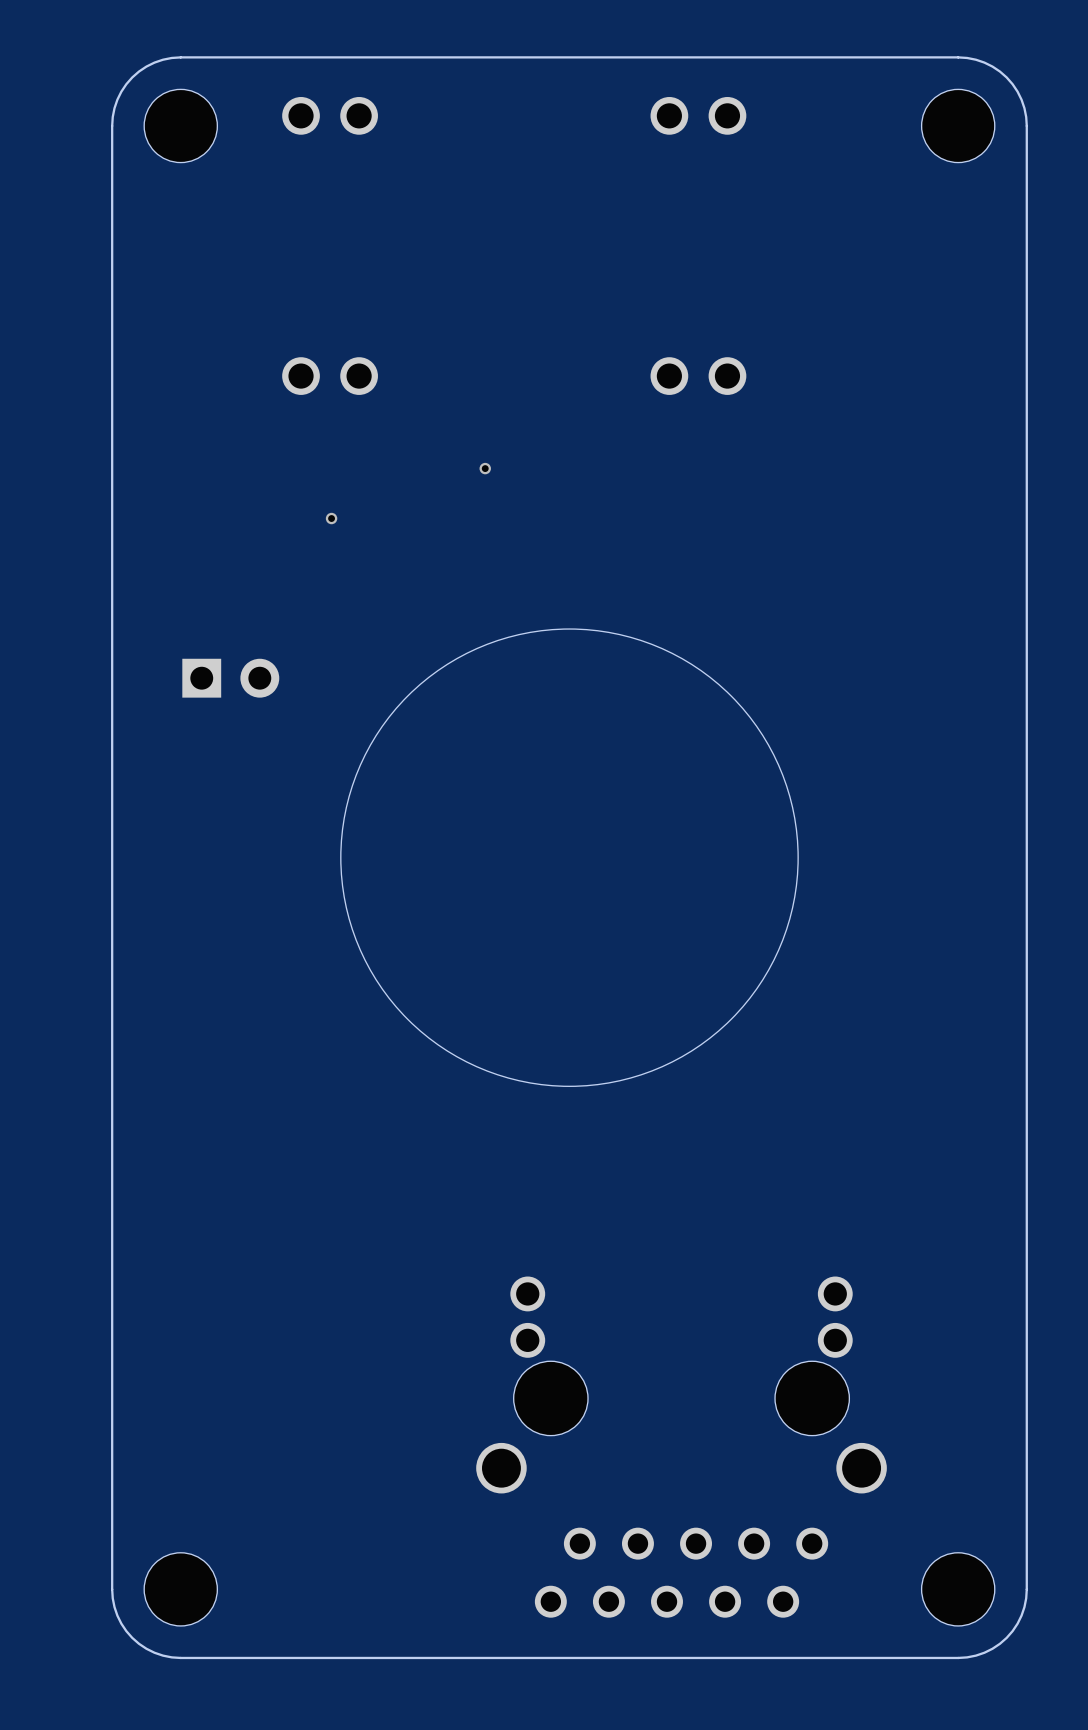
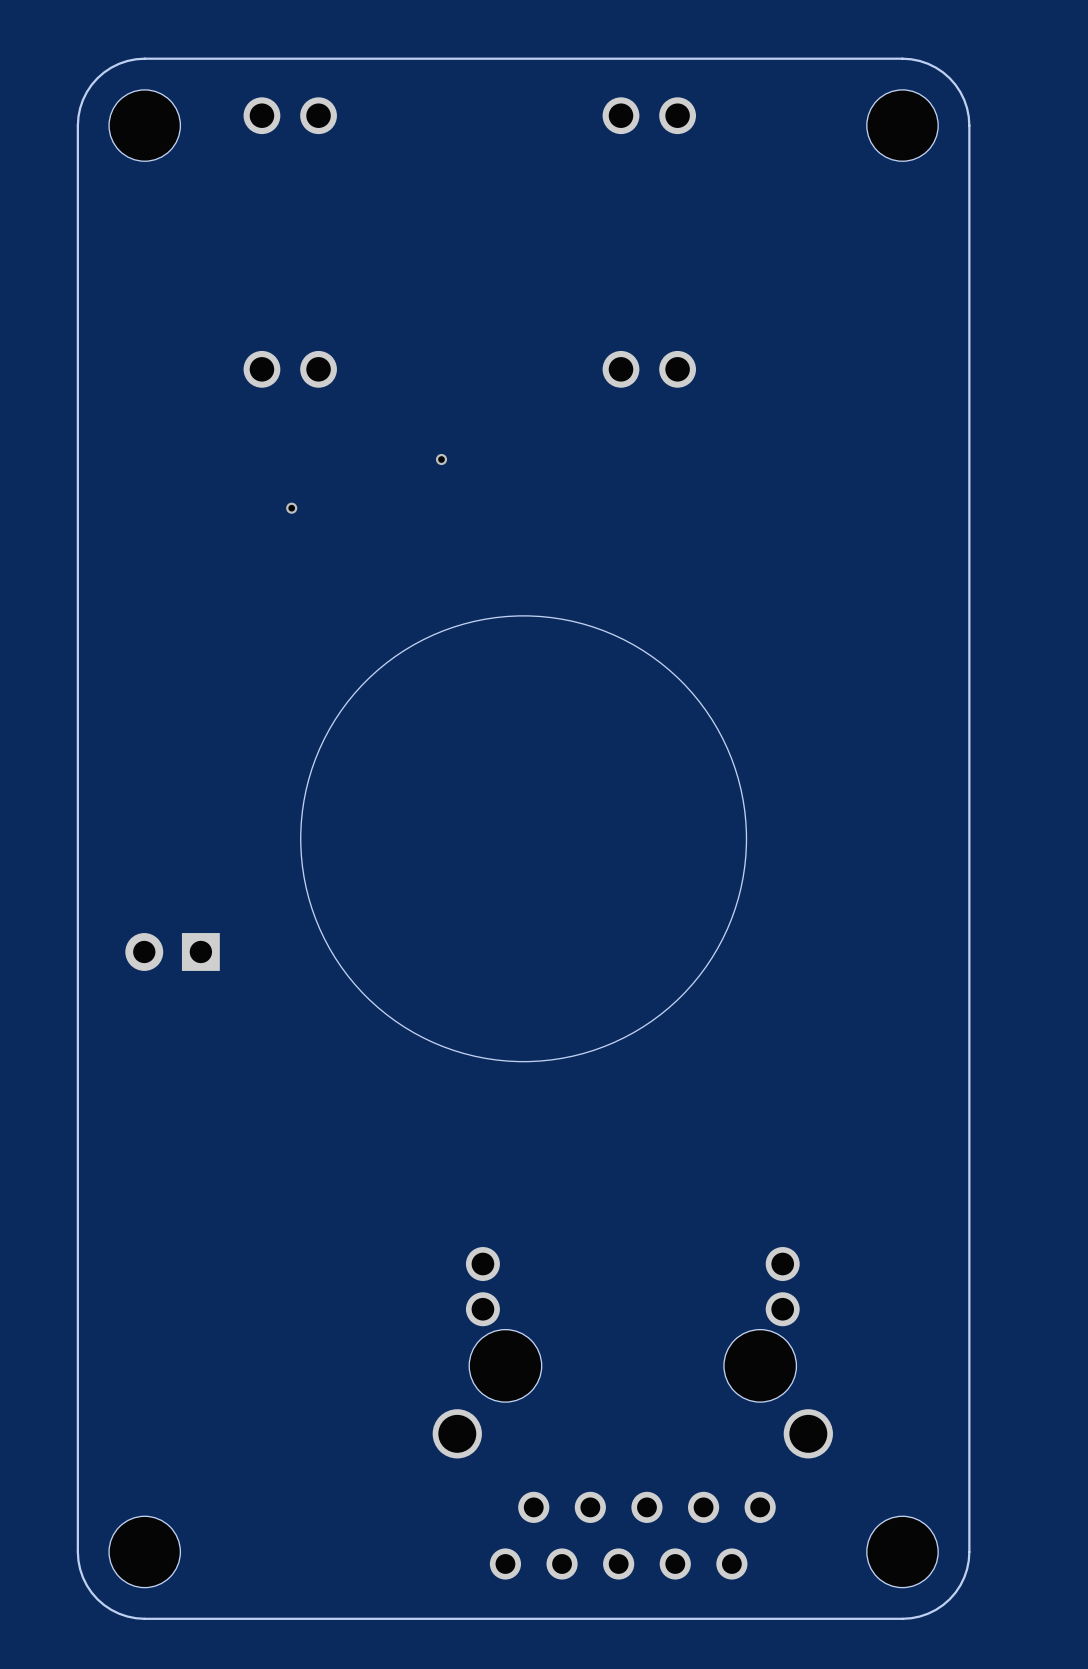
part rotation: 0° (230, 678) -> 180° (172, 951)
part position: (230, 678) -> (172, 951)

